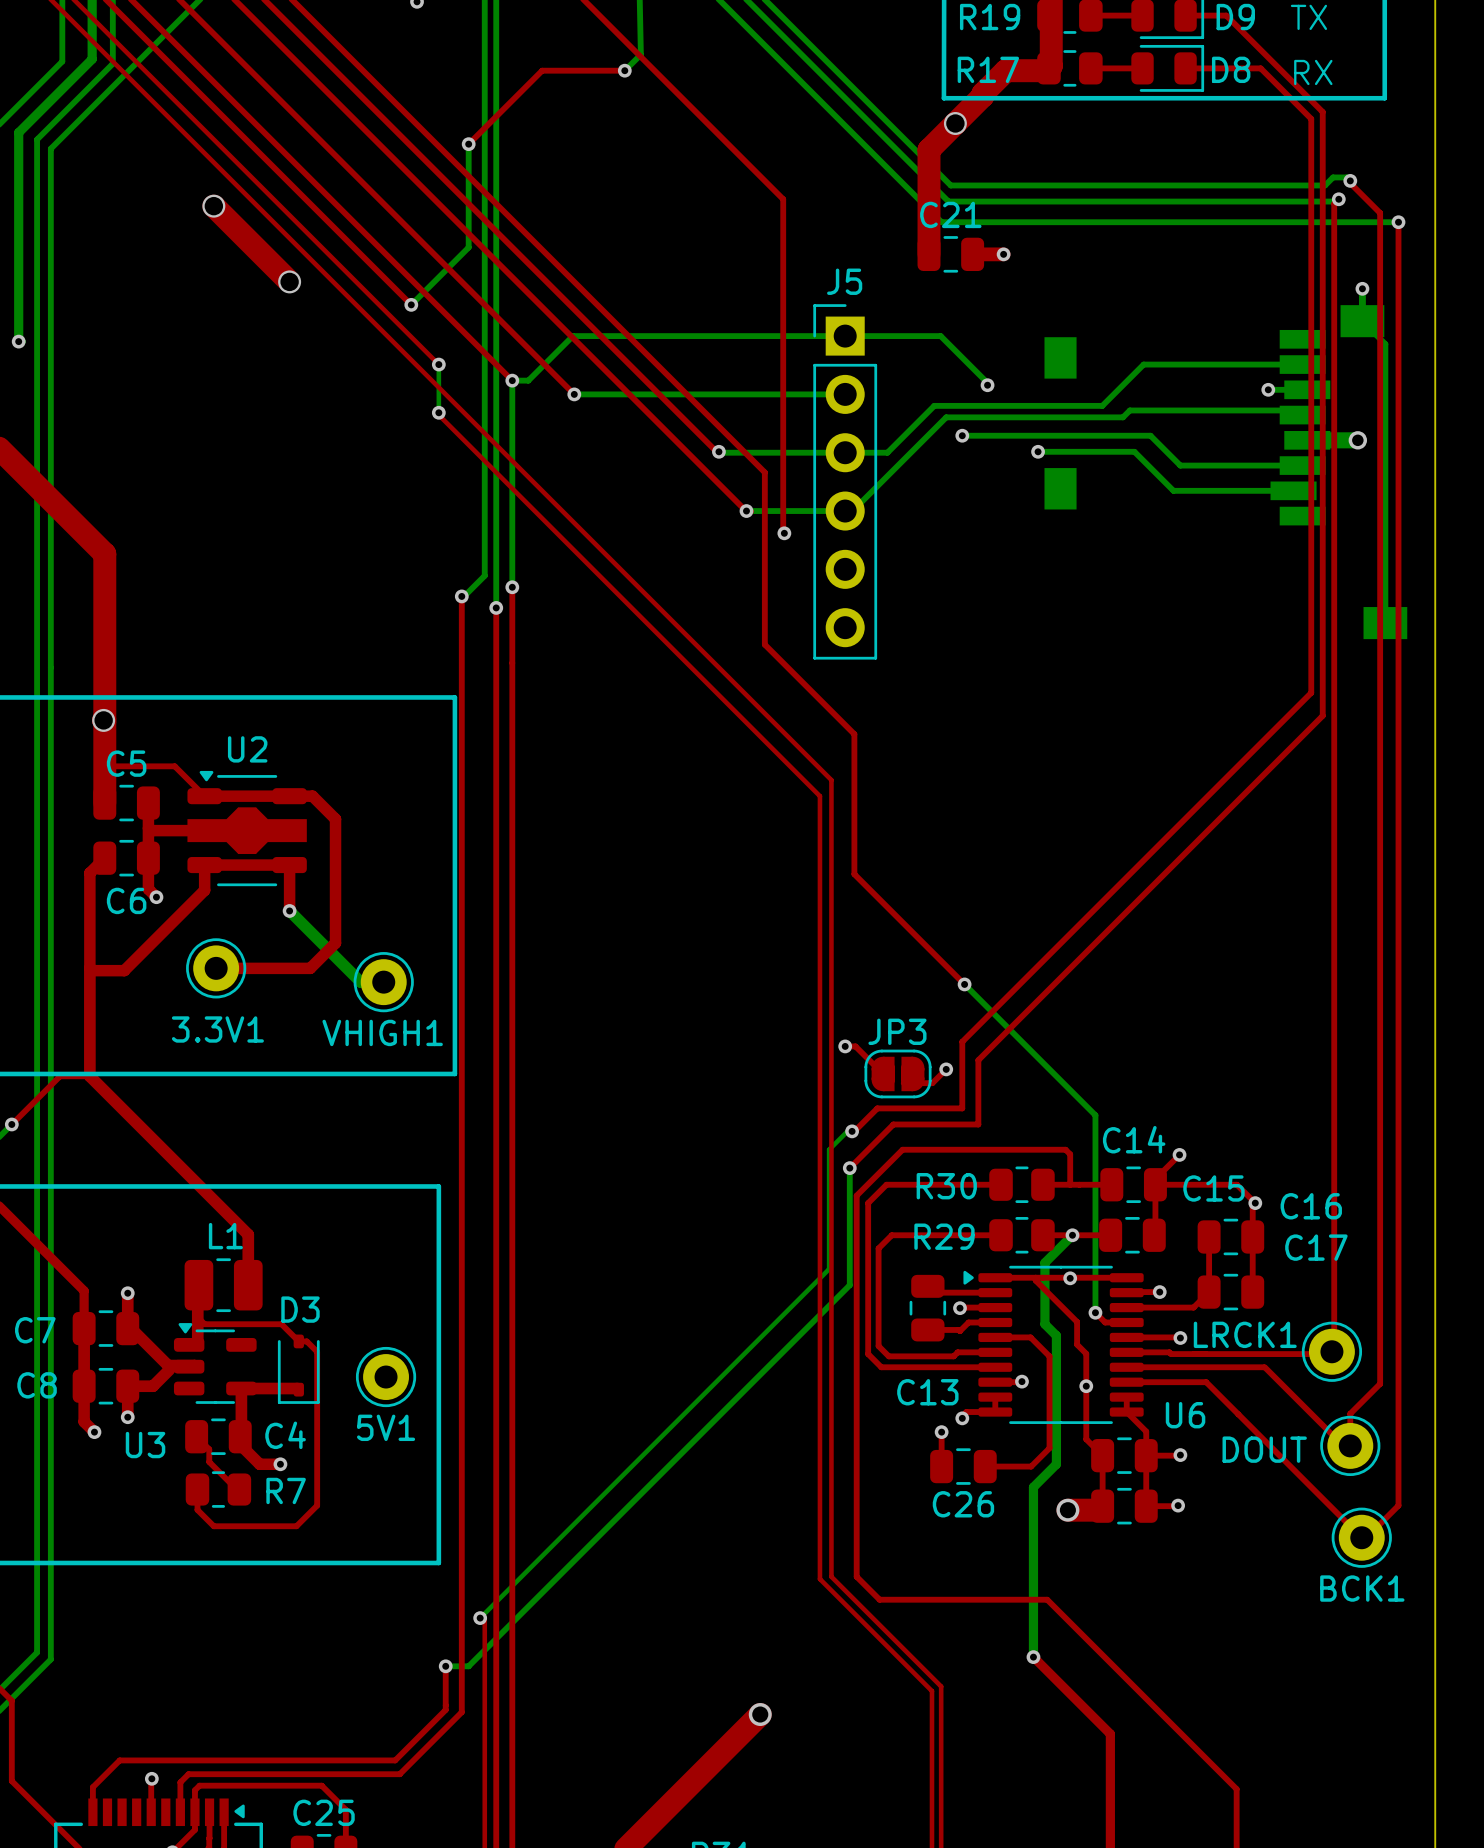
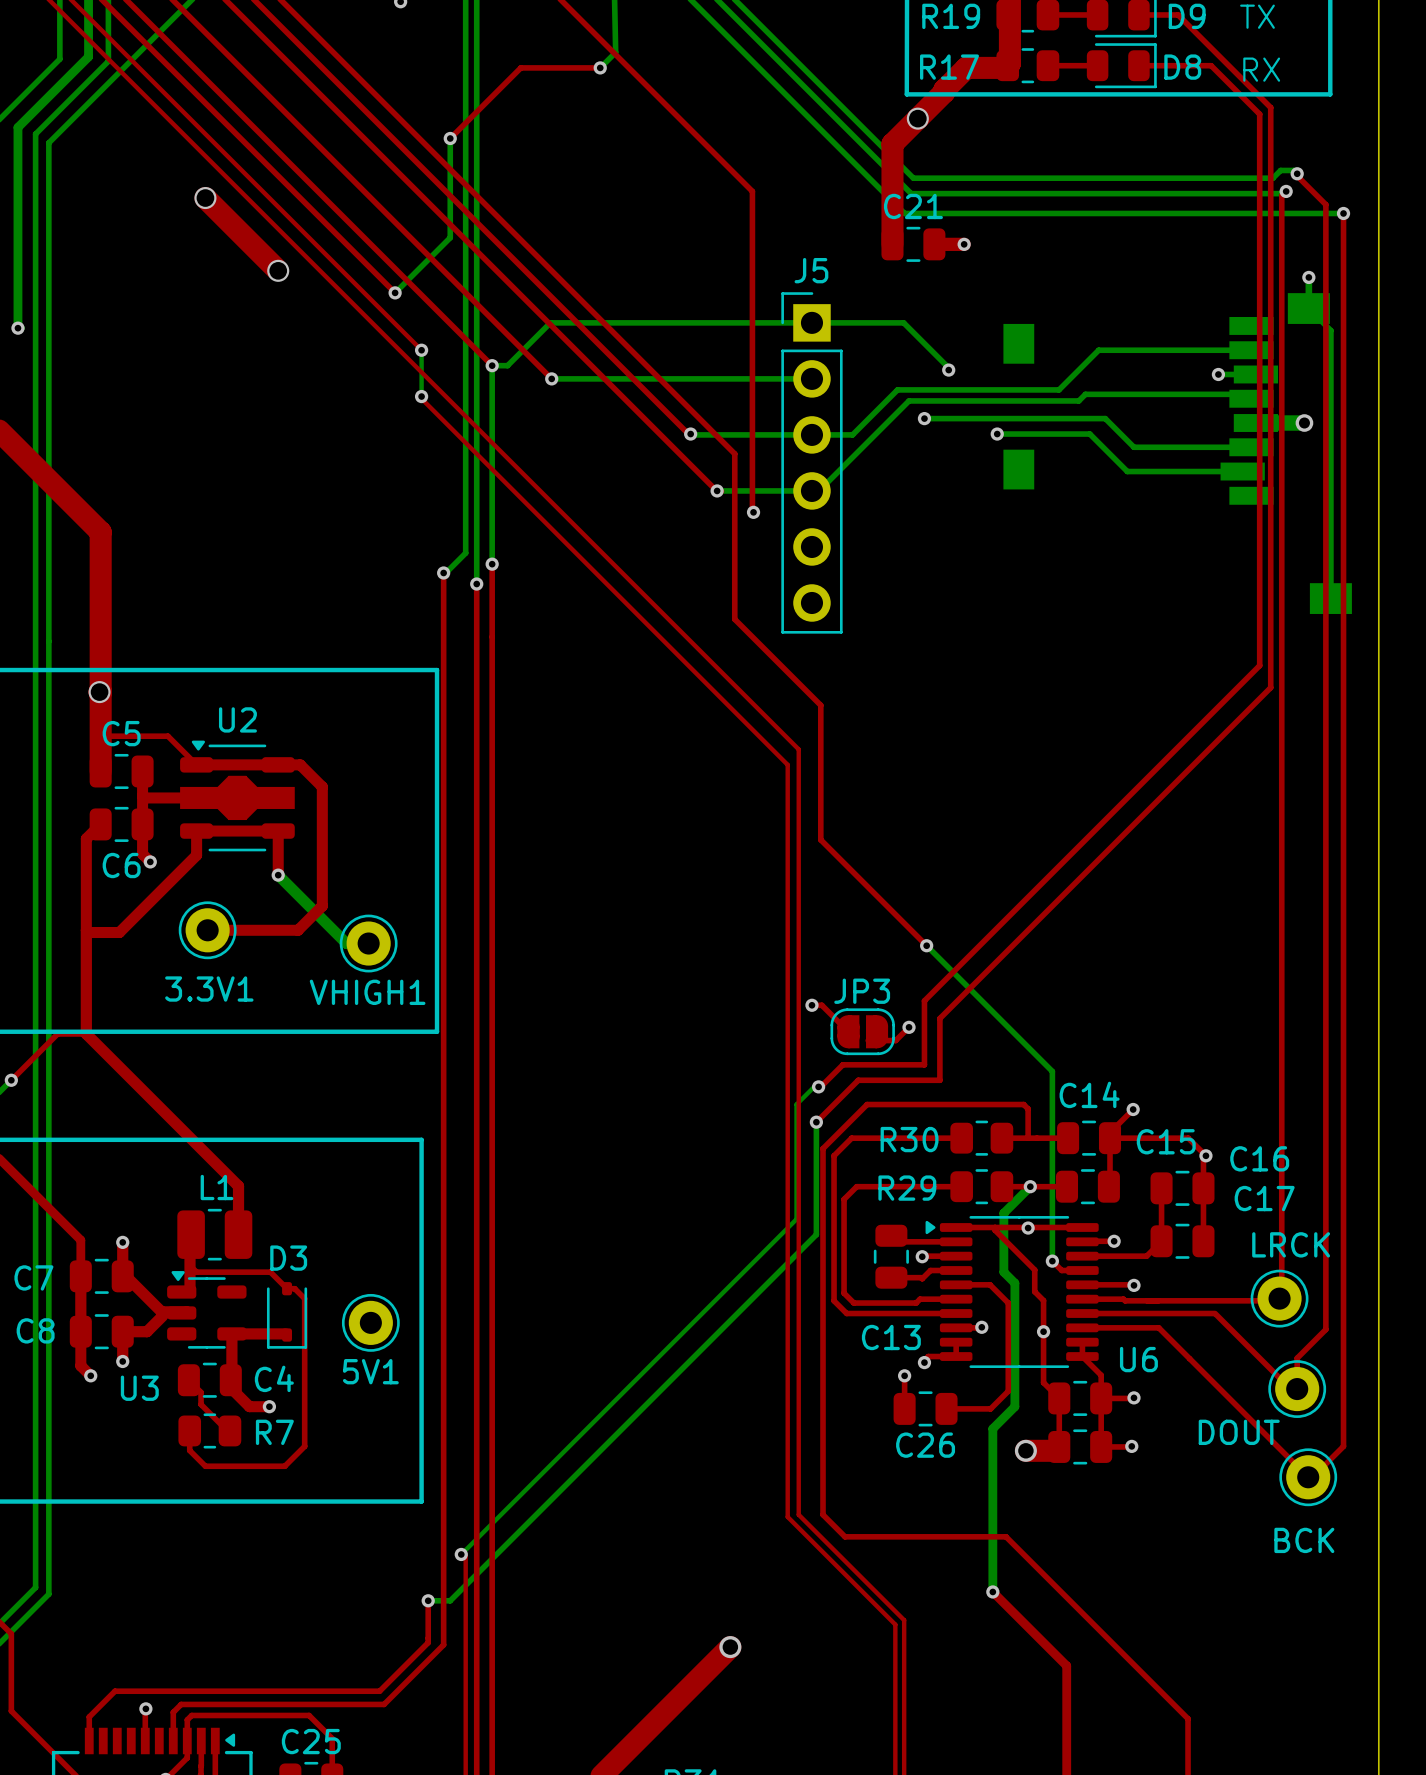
LRCK1 name: LRCK1 (1245, 1334) -> LRCK (1291, 1244)
text position: DOUT (1264, 1449) -> DOUT (1239, 1432)
BCK1 name: BCK1 (1362, 1588) -> BCK (1304, 1540)

